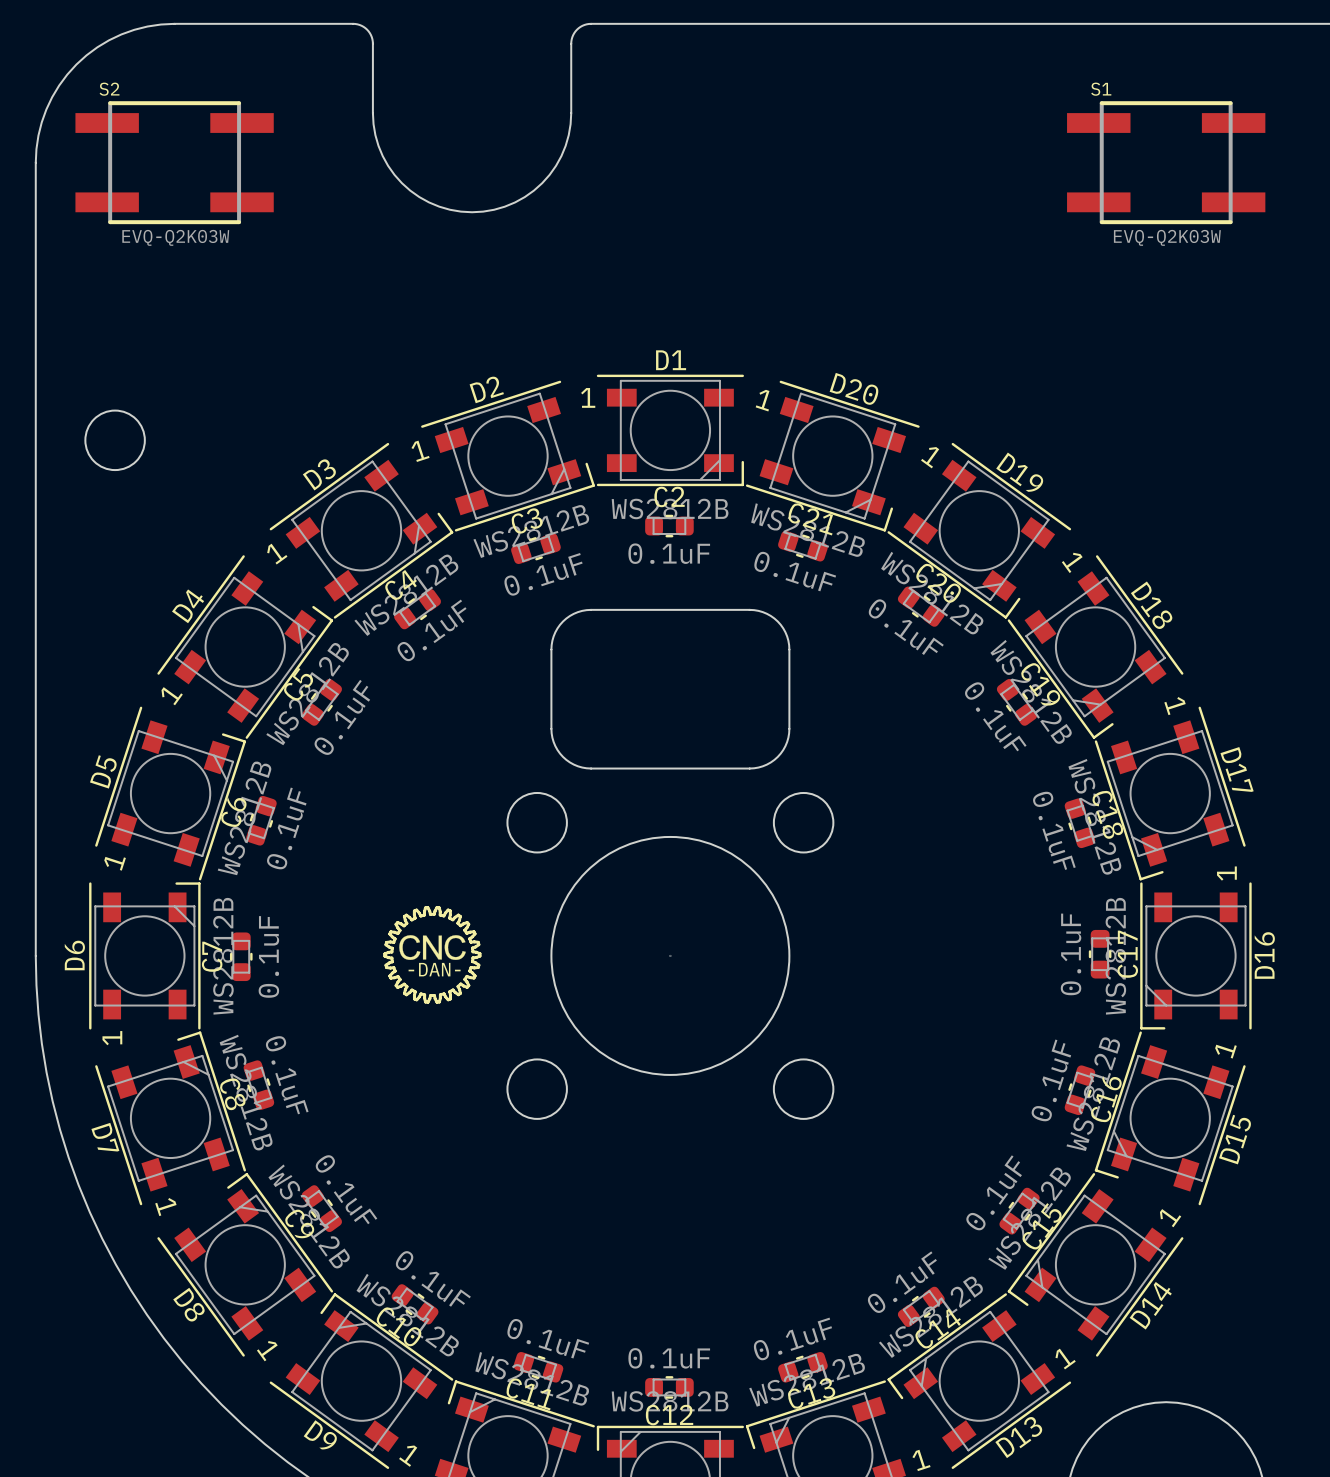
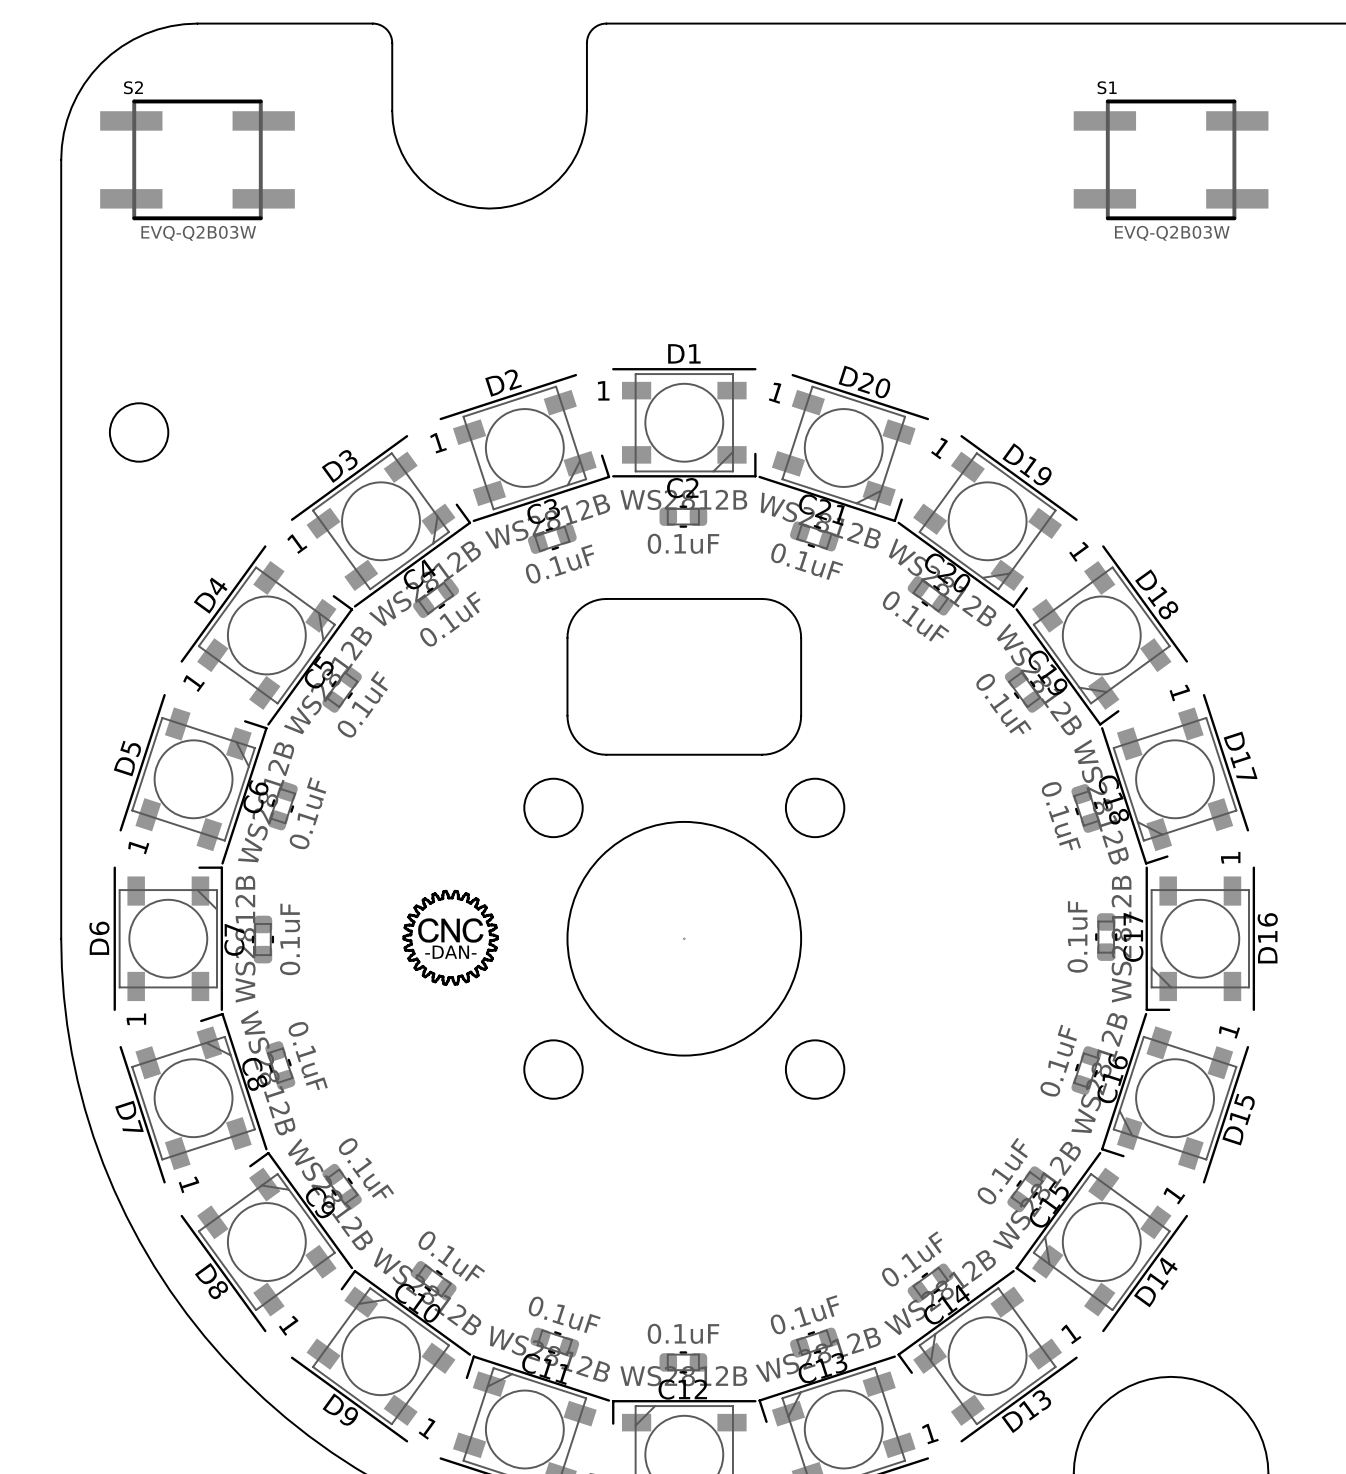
S2 value: EVQ-Q2K03W (175, 237) -> EVQ-Q2B03W (198, 233)
S1 value: EVQ-Q2K03W (1167, 237) -> EVQ-Q2B03W (1172, 233)

